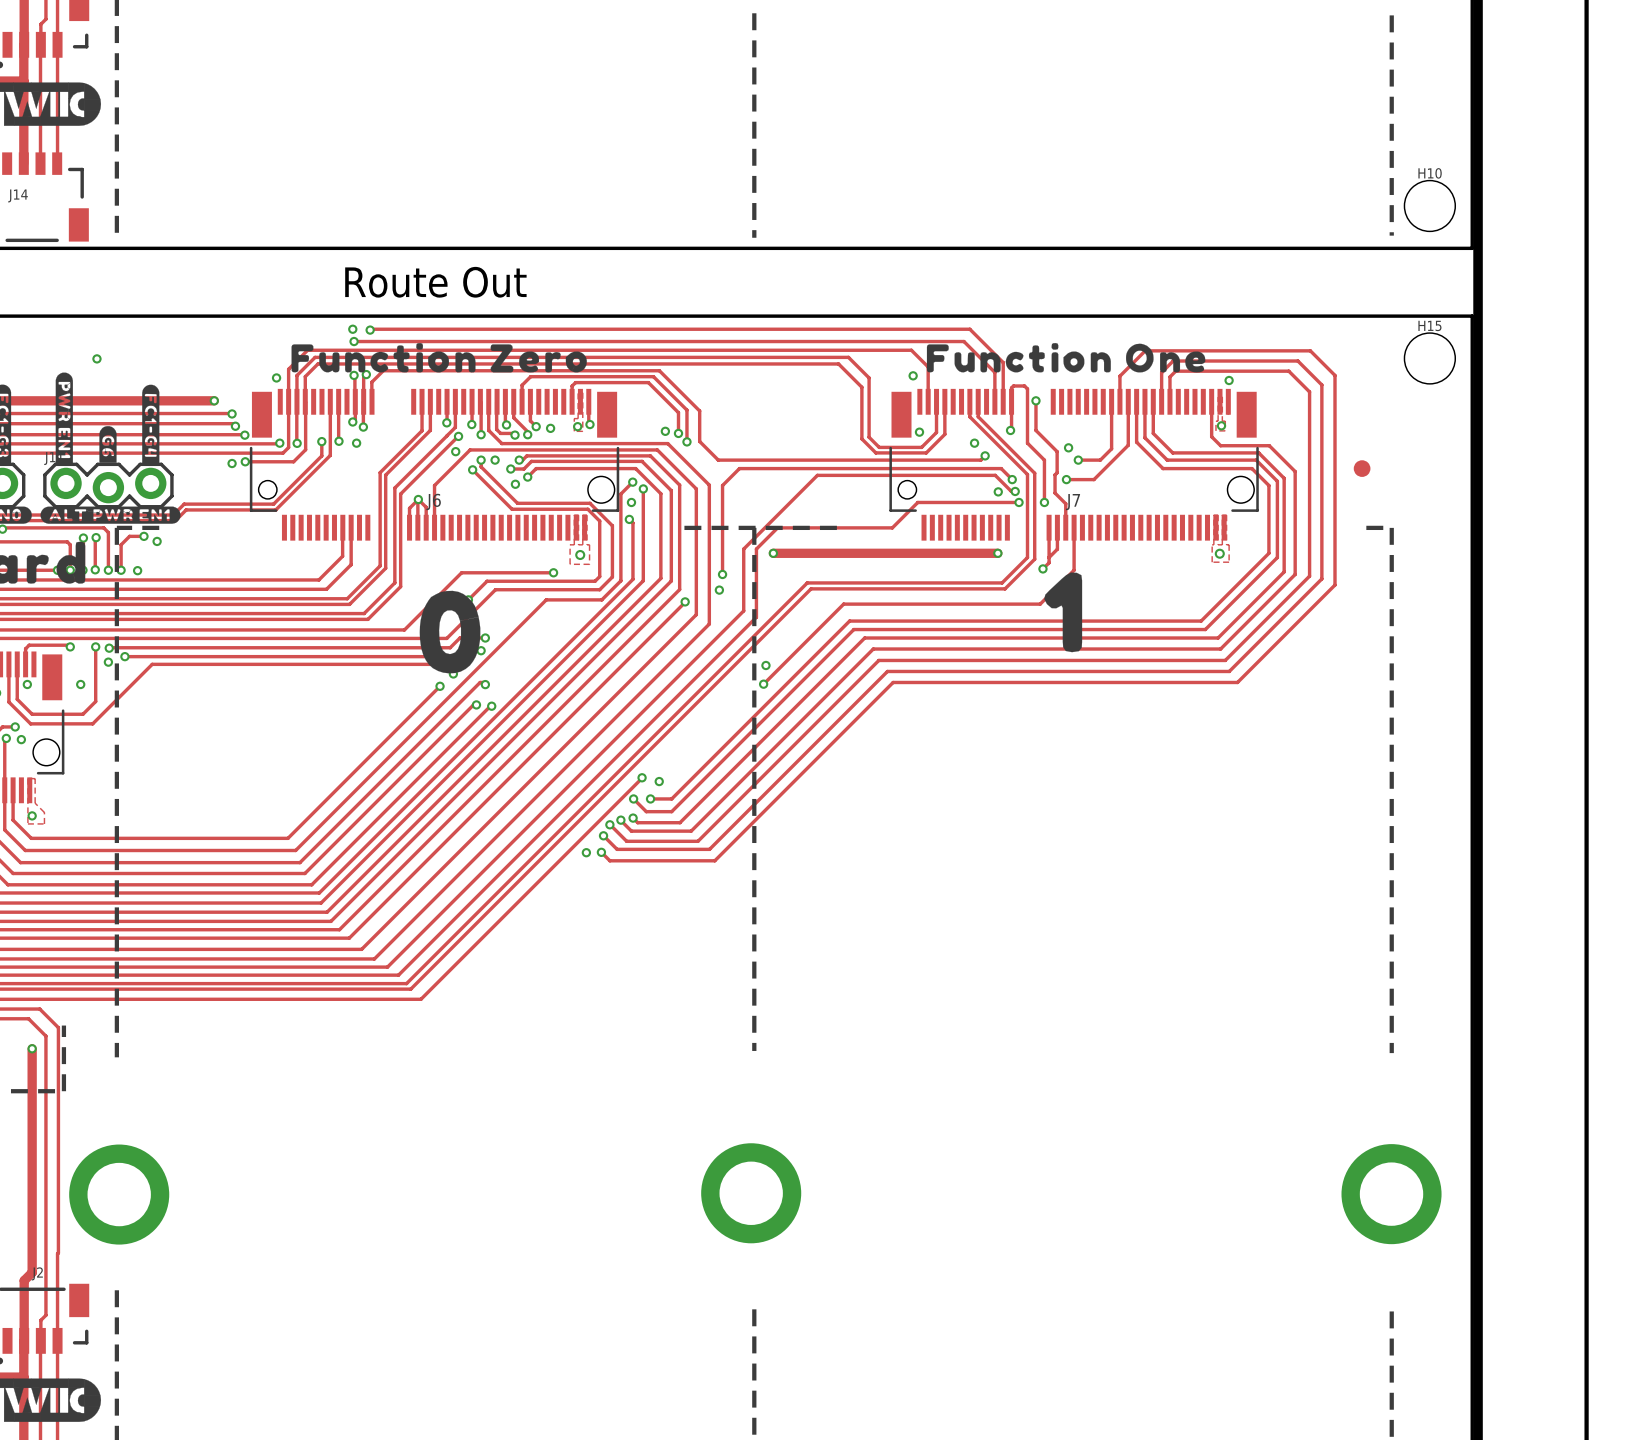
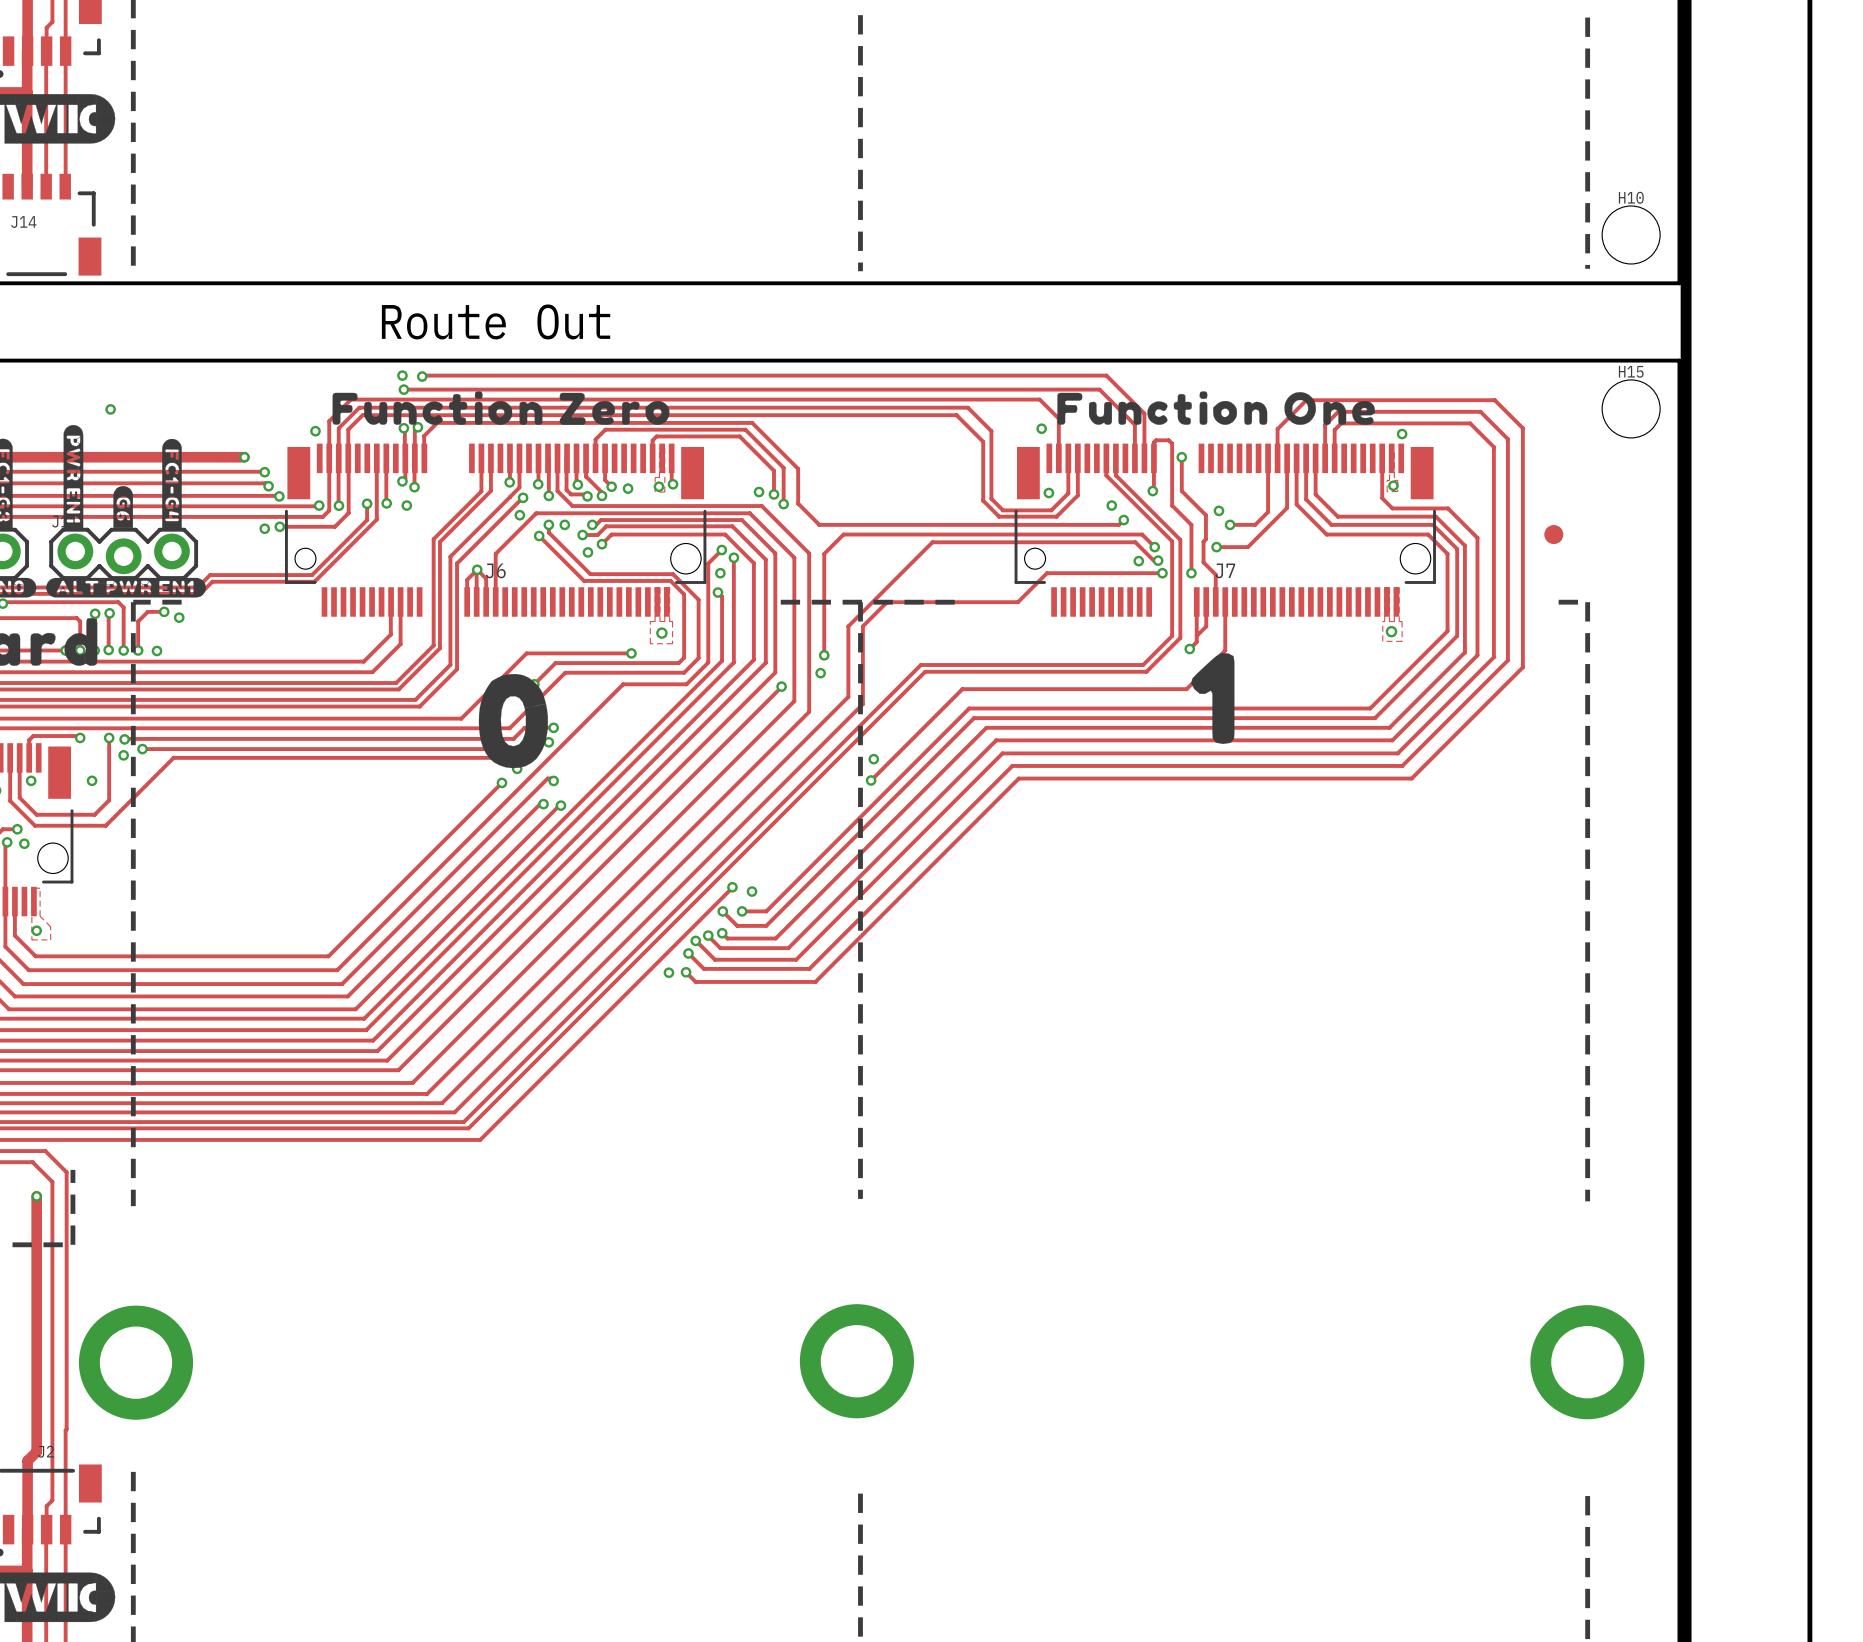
track: (773, 553) (997, 553) -> none
via: (773, 553) -> none
via: (997, 553) -> none

